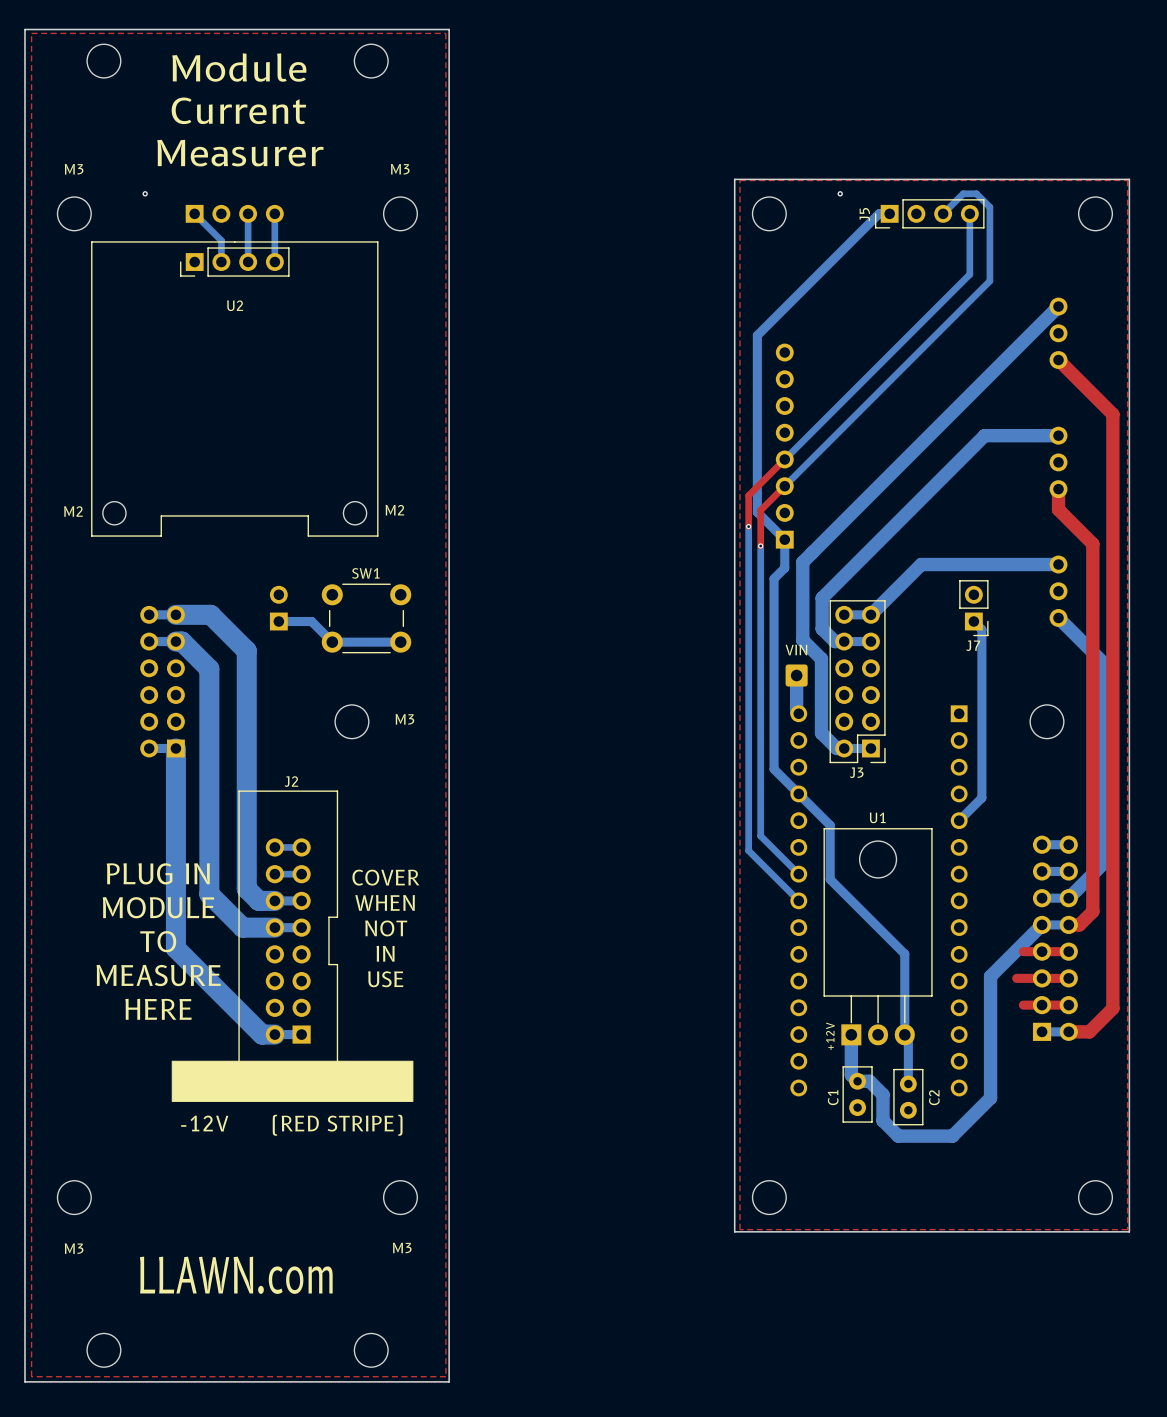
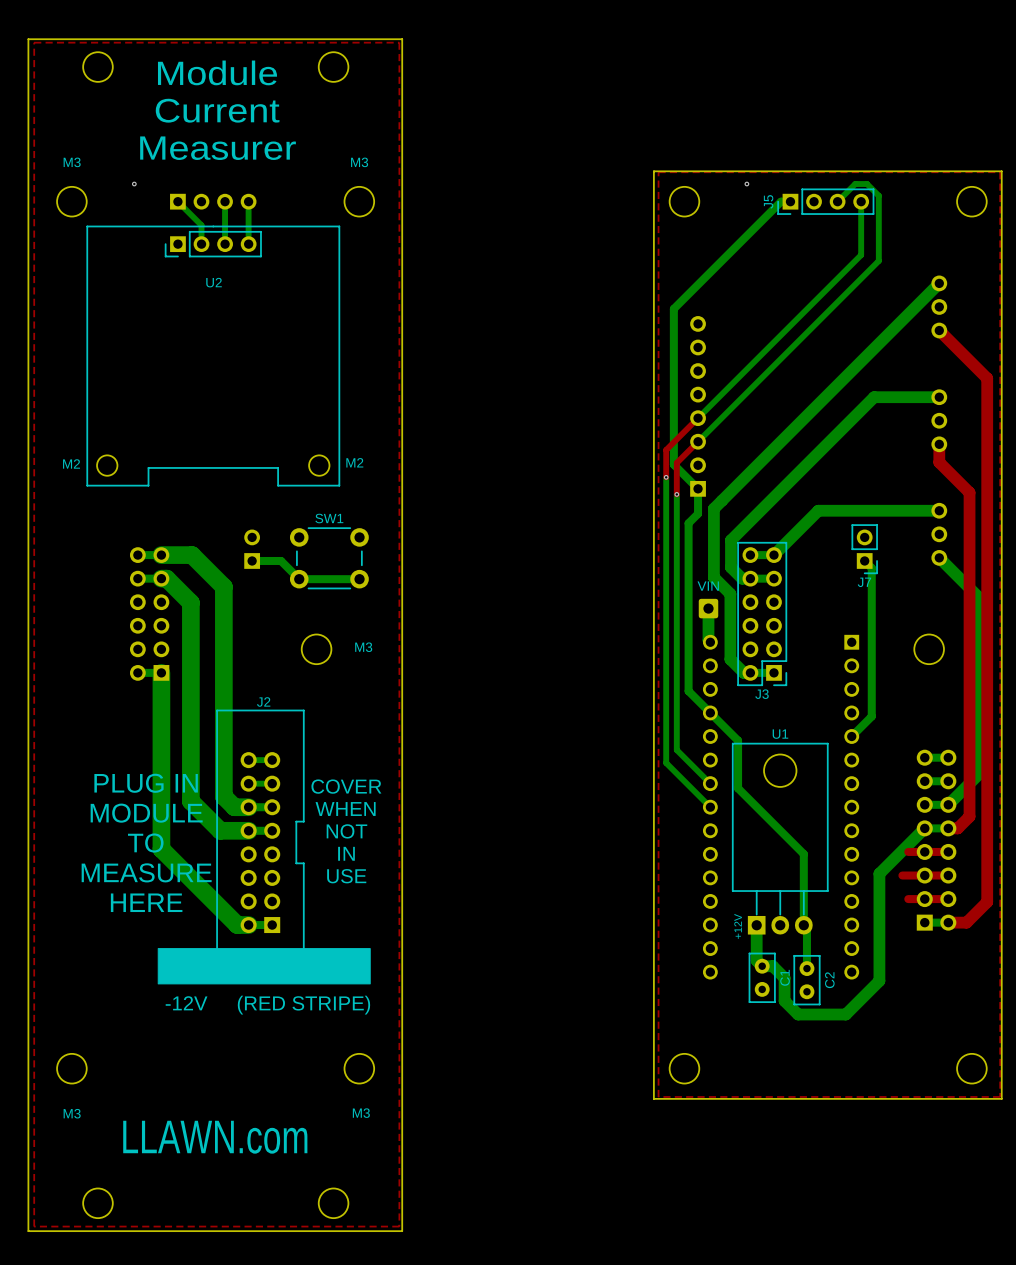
C1 name position: C1 (833, 1097) -> C1 (785, 977)

